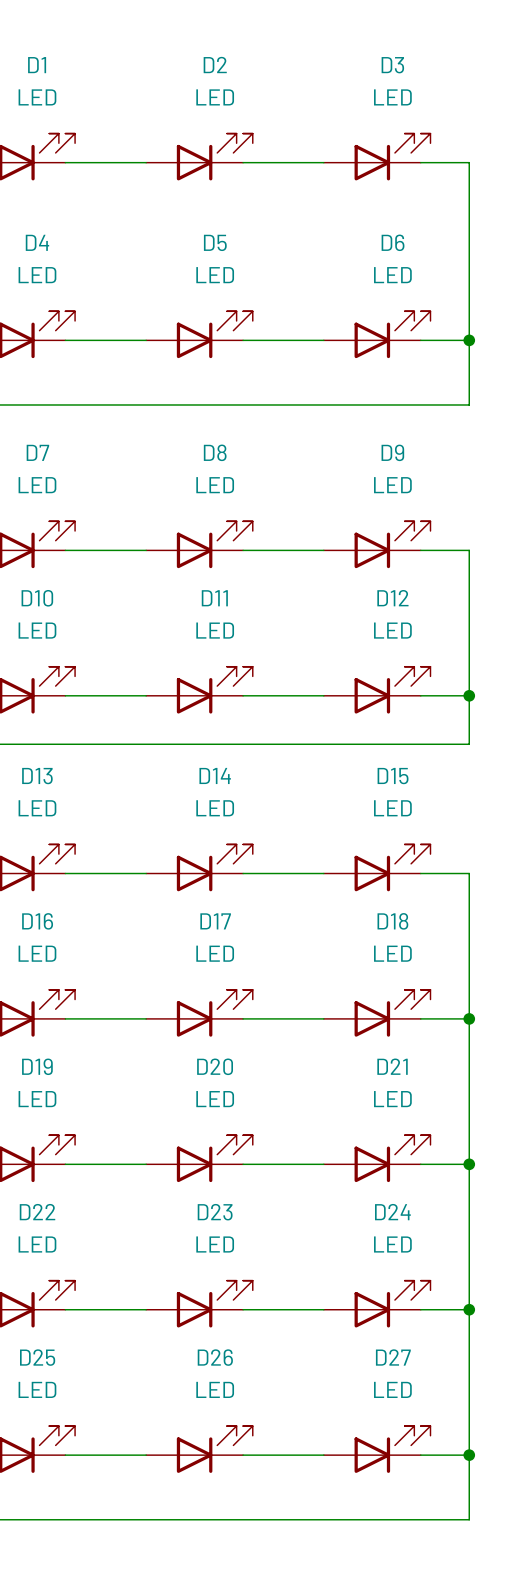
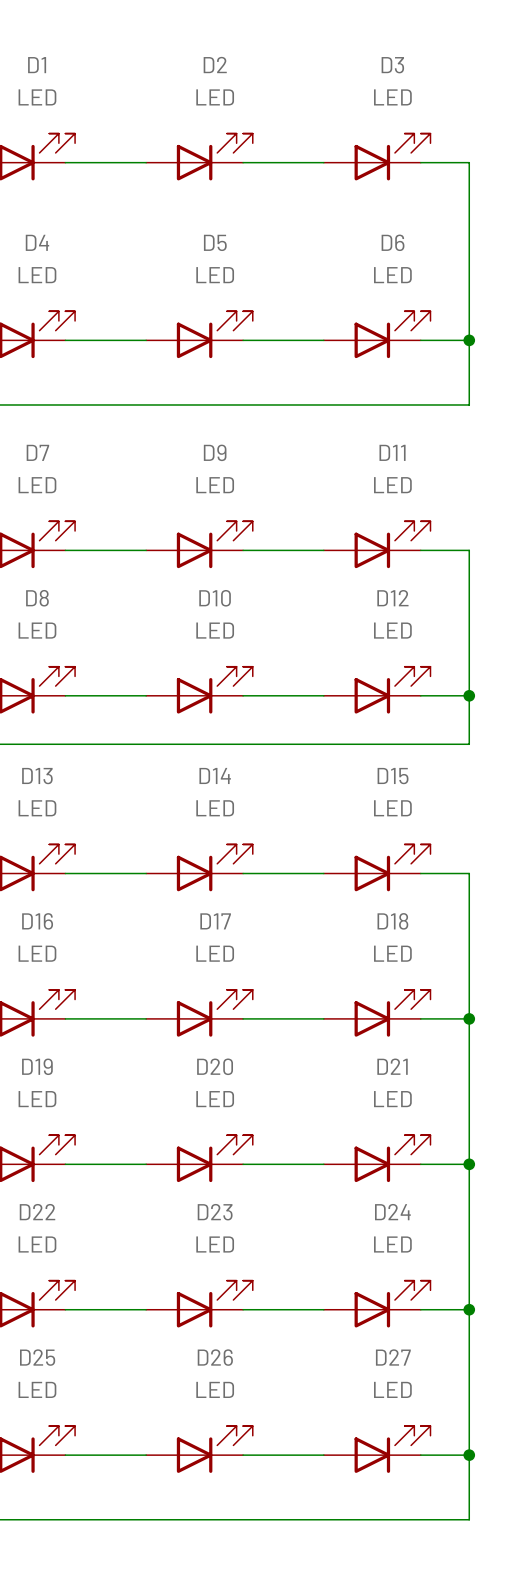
D8 name: D8 (215, 452) -> D9 (215, 452)
D9 name: D9 (392, 452) -> D11 (392, 452)
D10 name: D10 (37, 598) -> D8 (37, 598)
D11 name: D11 (214, 598) -> D10 (215, 598)

